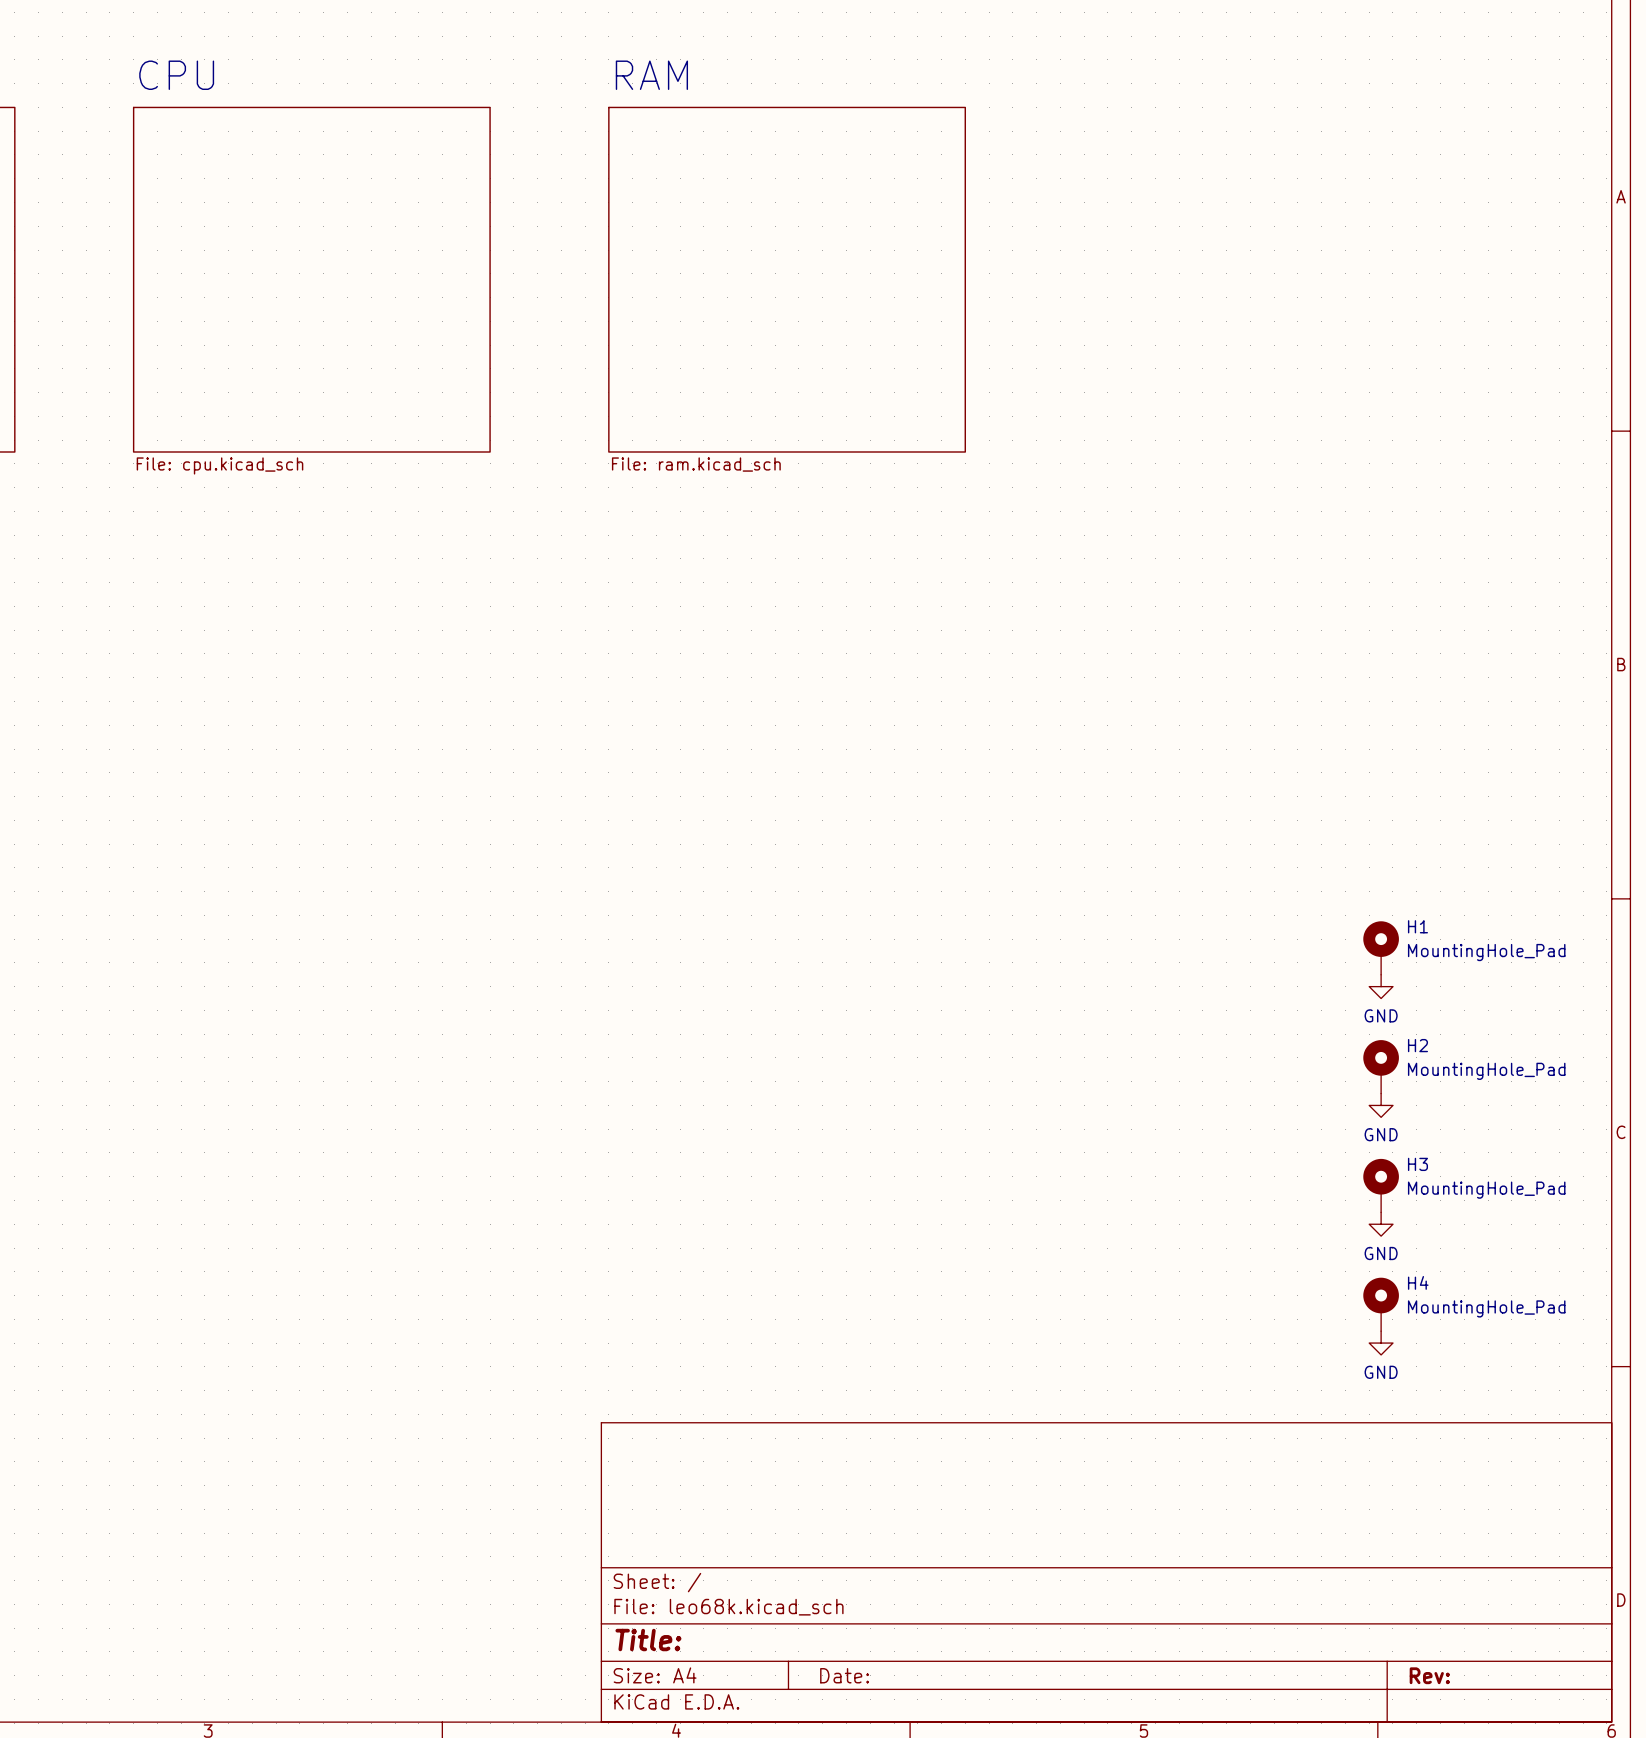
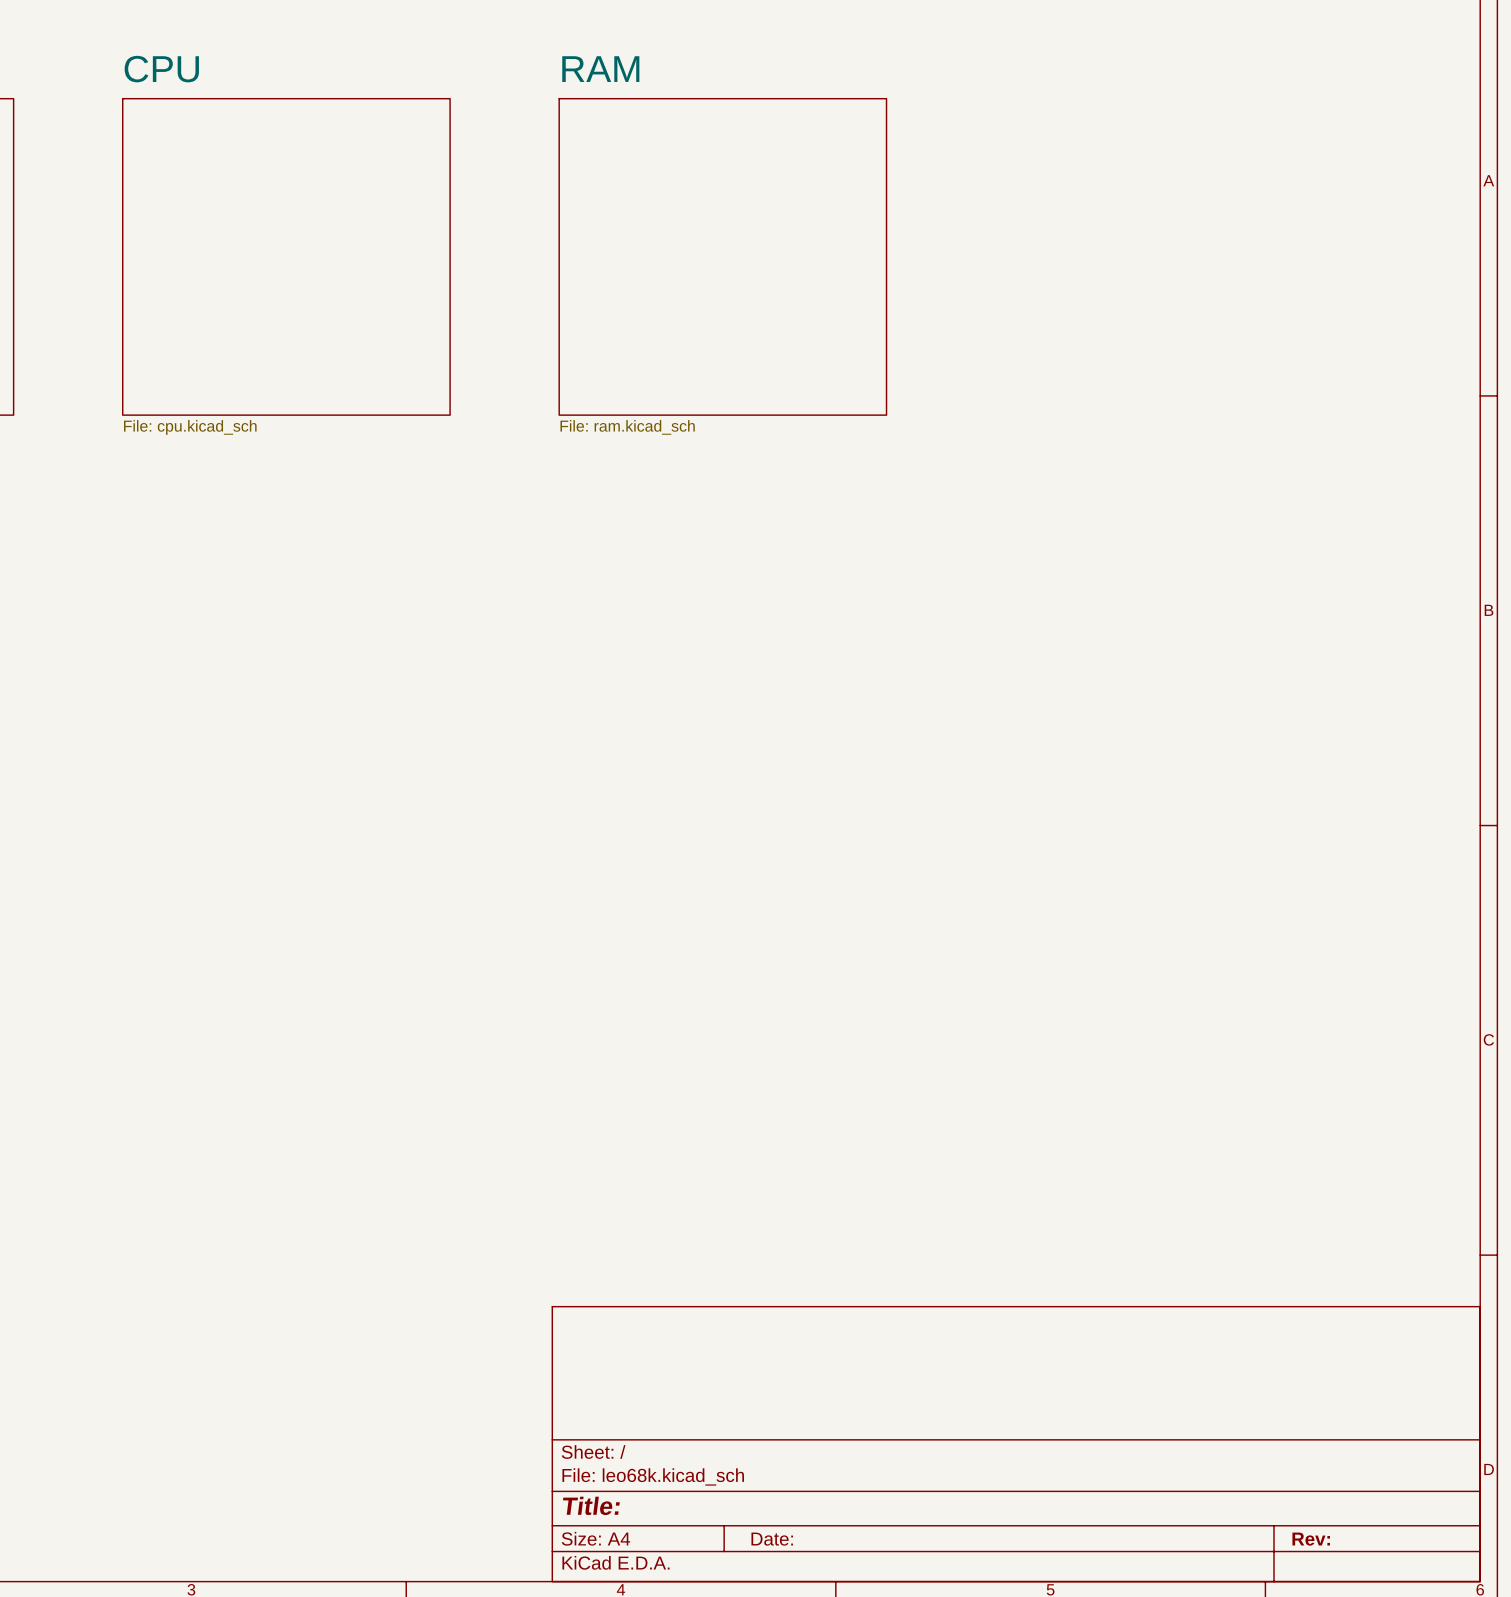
H1: MountingHole_Pad (1381, 948) -> none
power symbol: GND (1381, 986) -> none
H2: MountingHole_Pad (1381, 1066) -> none
power symbol: GND (1381, 1105) -> none
H3: MountingHole_Pad (1381, 1185) -> none
power symbol: GND (1381, 1224) -> none
H4: MountingHole_Pad (1381, 1304) -> none
power symbol: GND (1381, 1343) -> none

